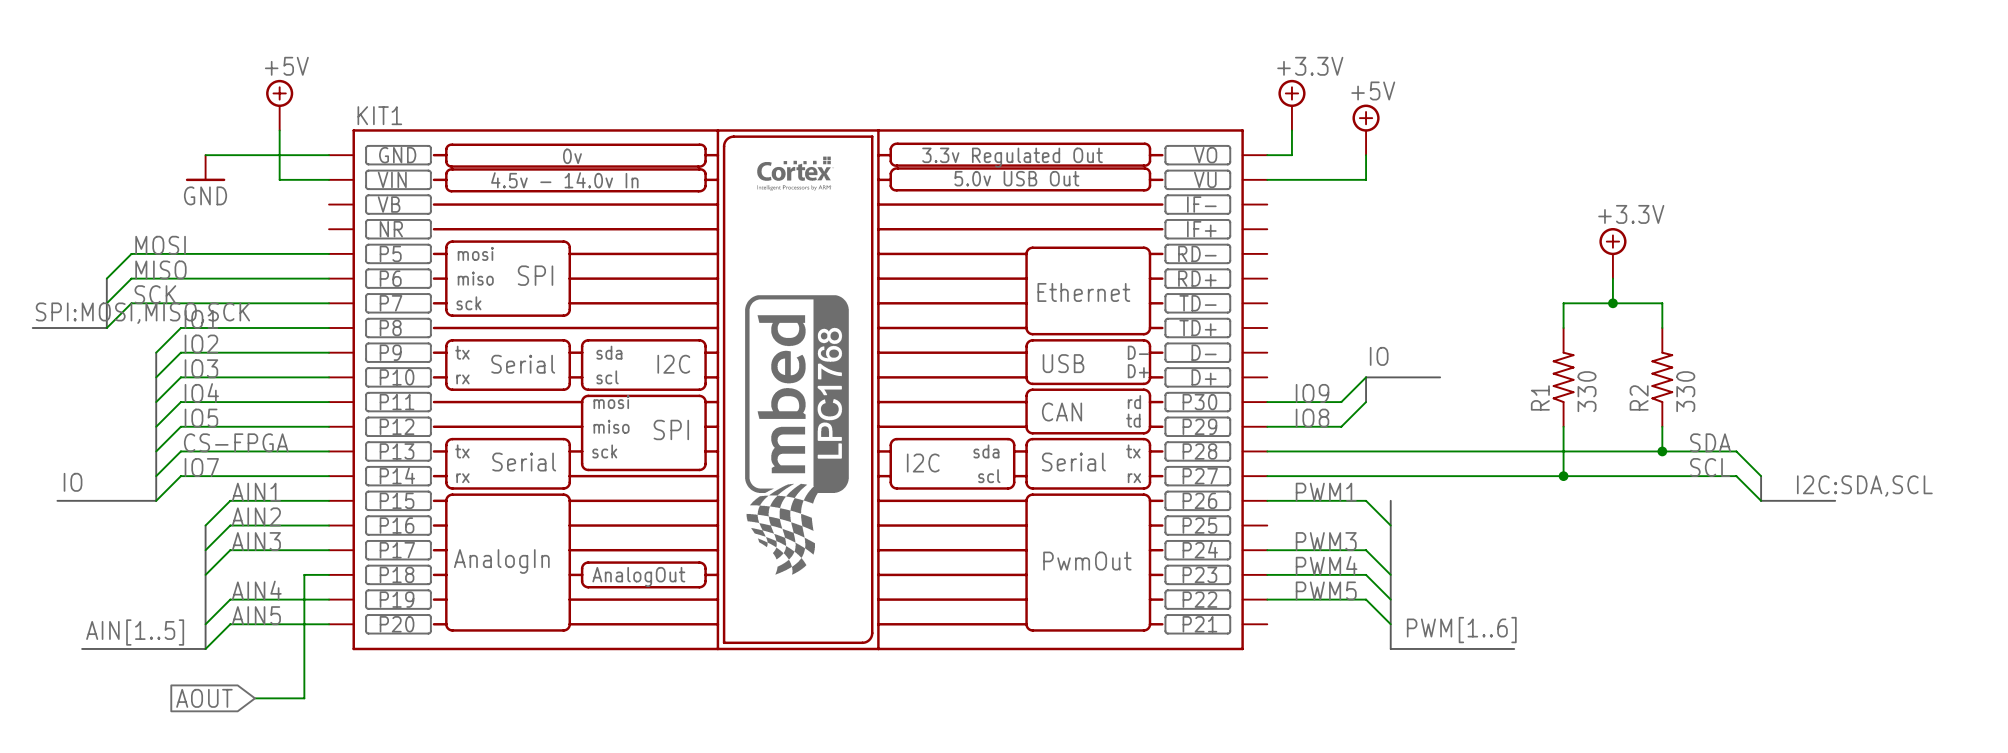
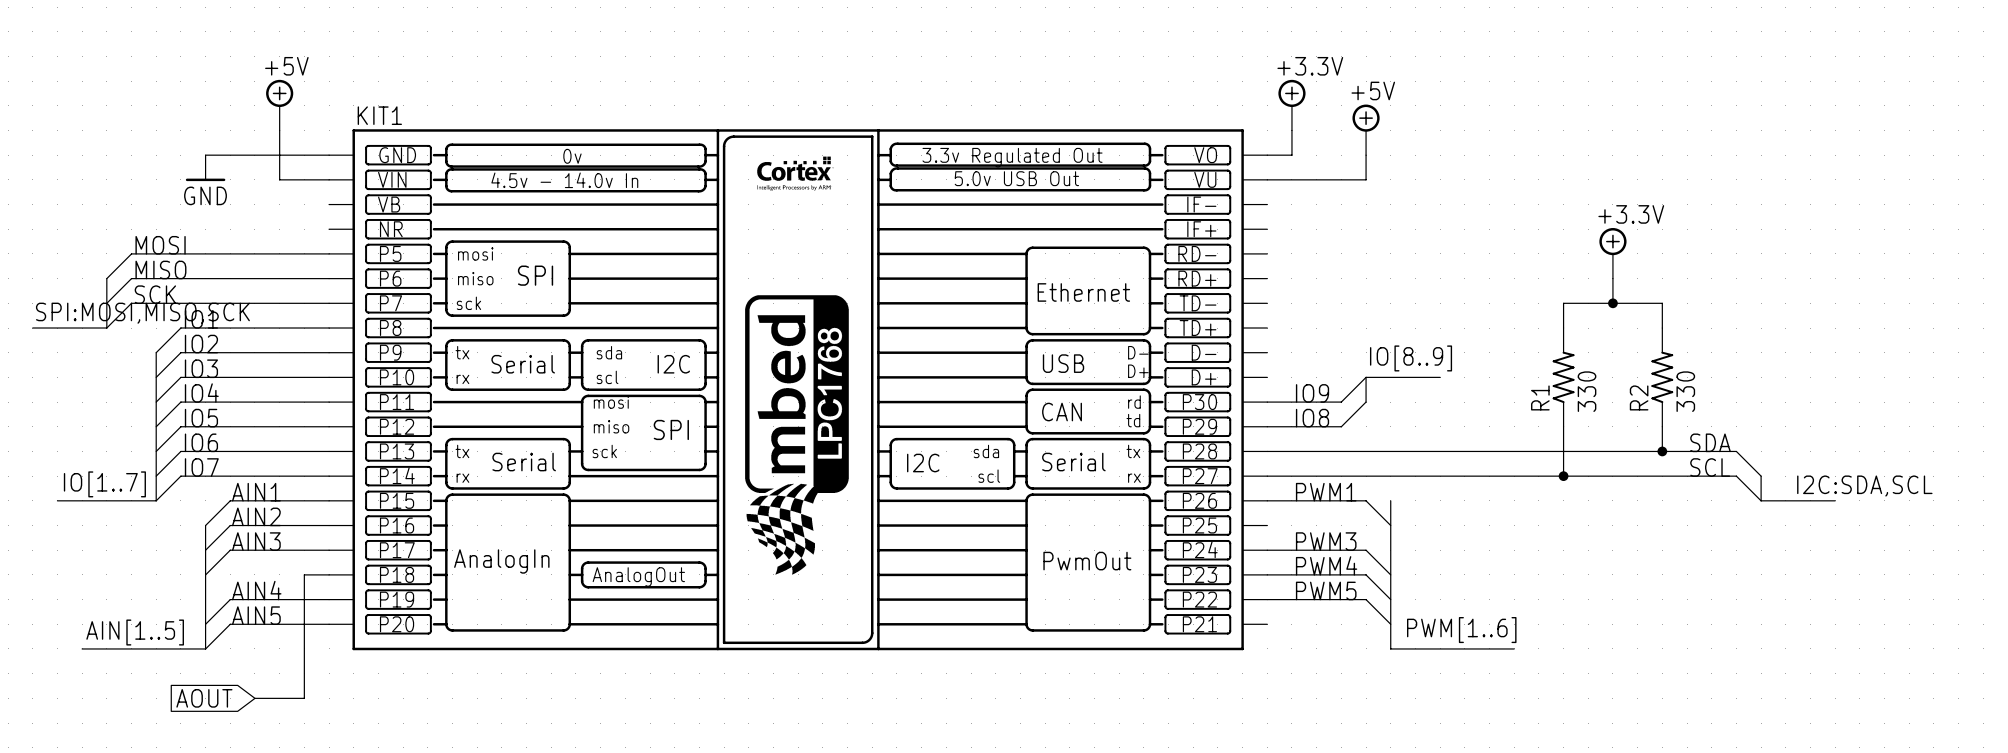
label: IO (1379, 356) -> IO[8..9] (1411, 358)
label: CS-FPGA (236, 442) -> IO6 (201, 442)
label: IO (73, 482) -> IO[1..7] (104, 484)

